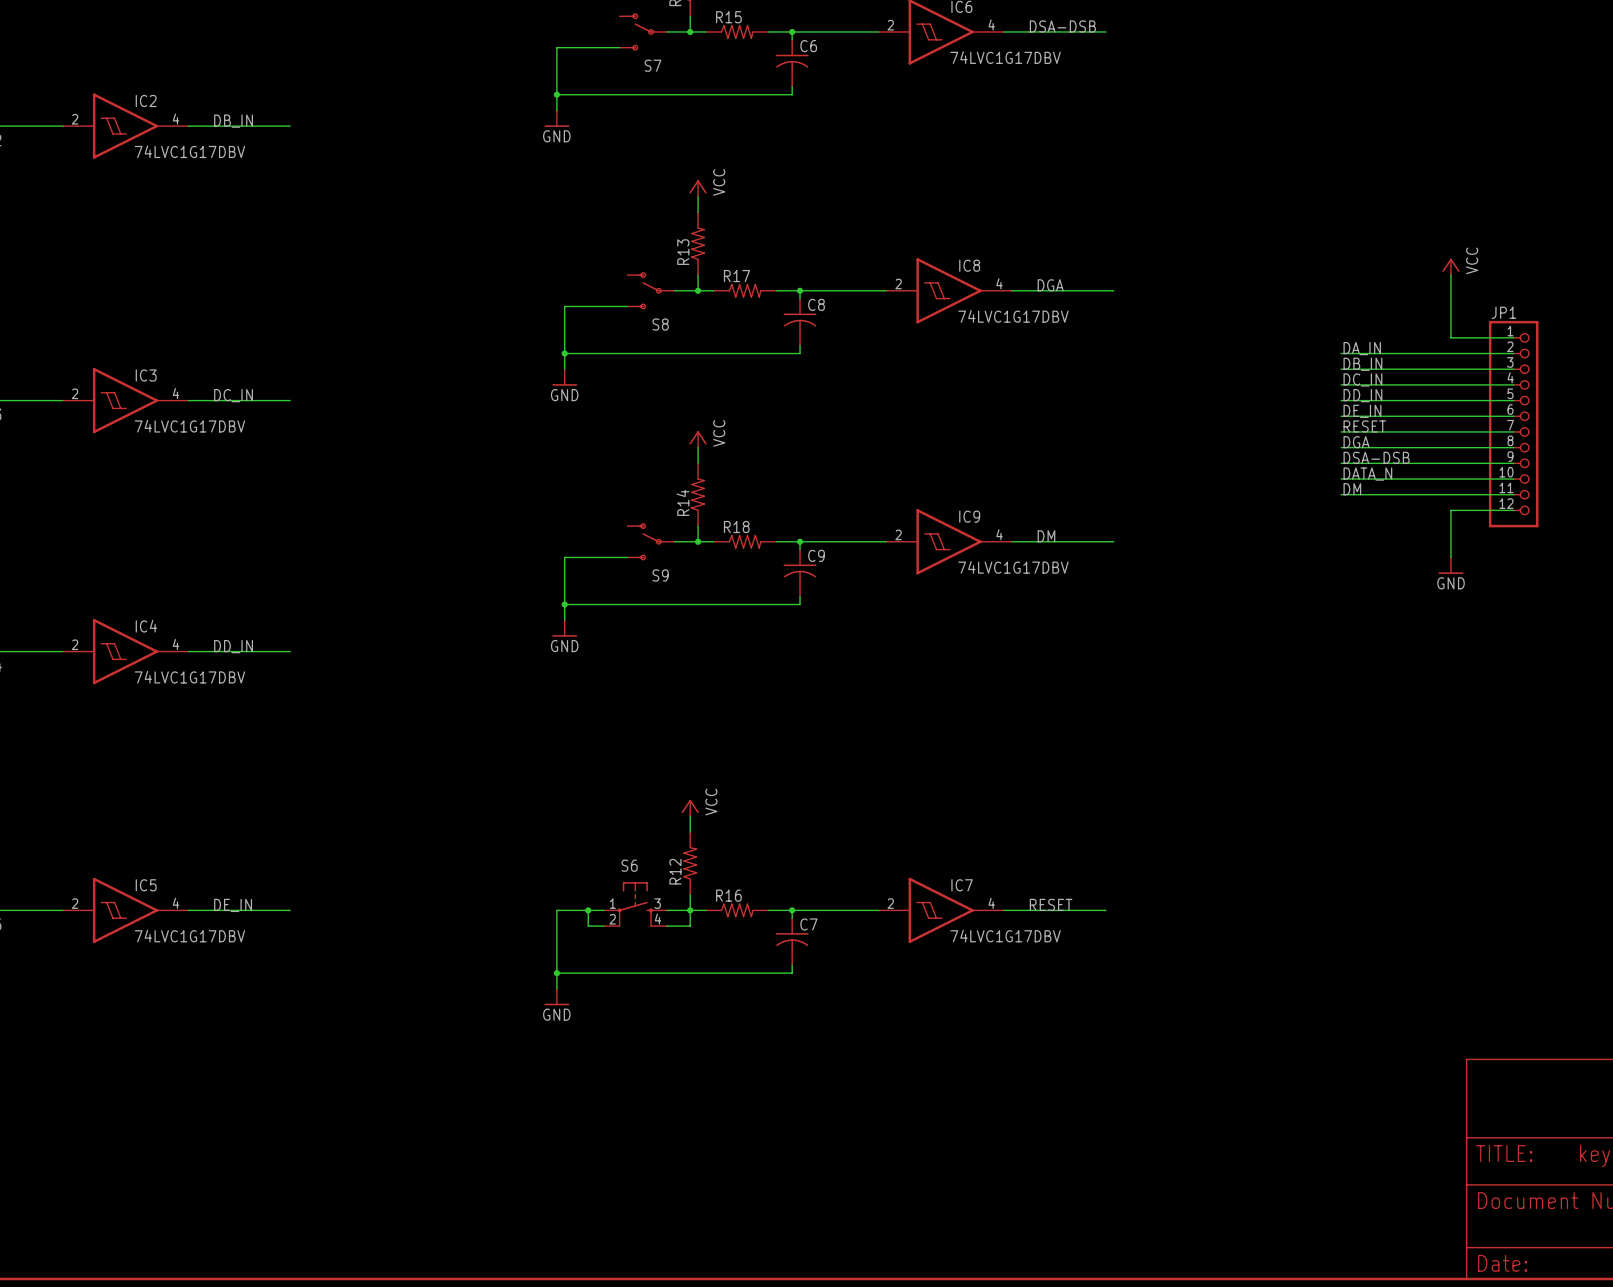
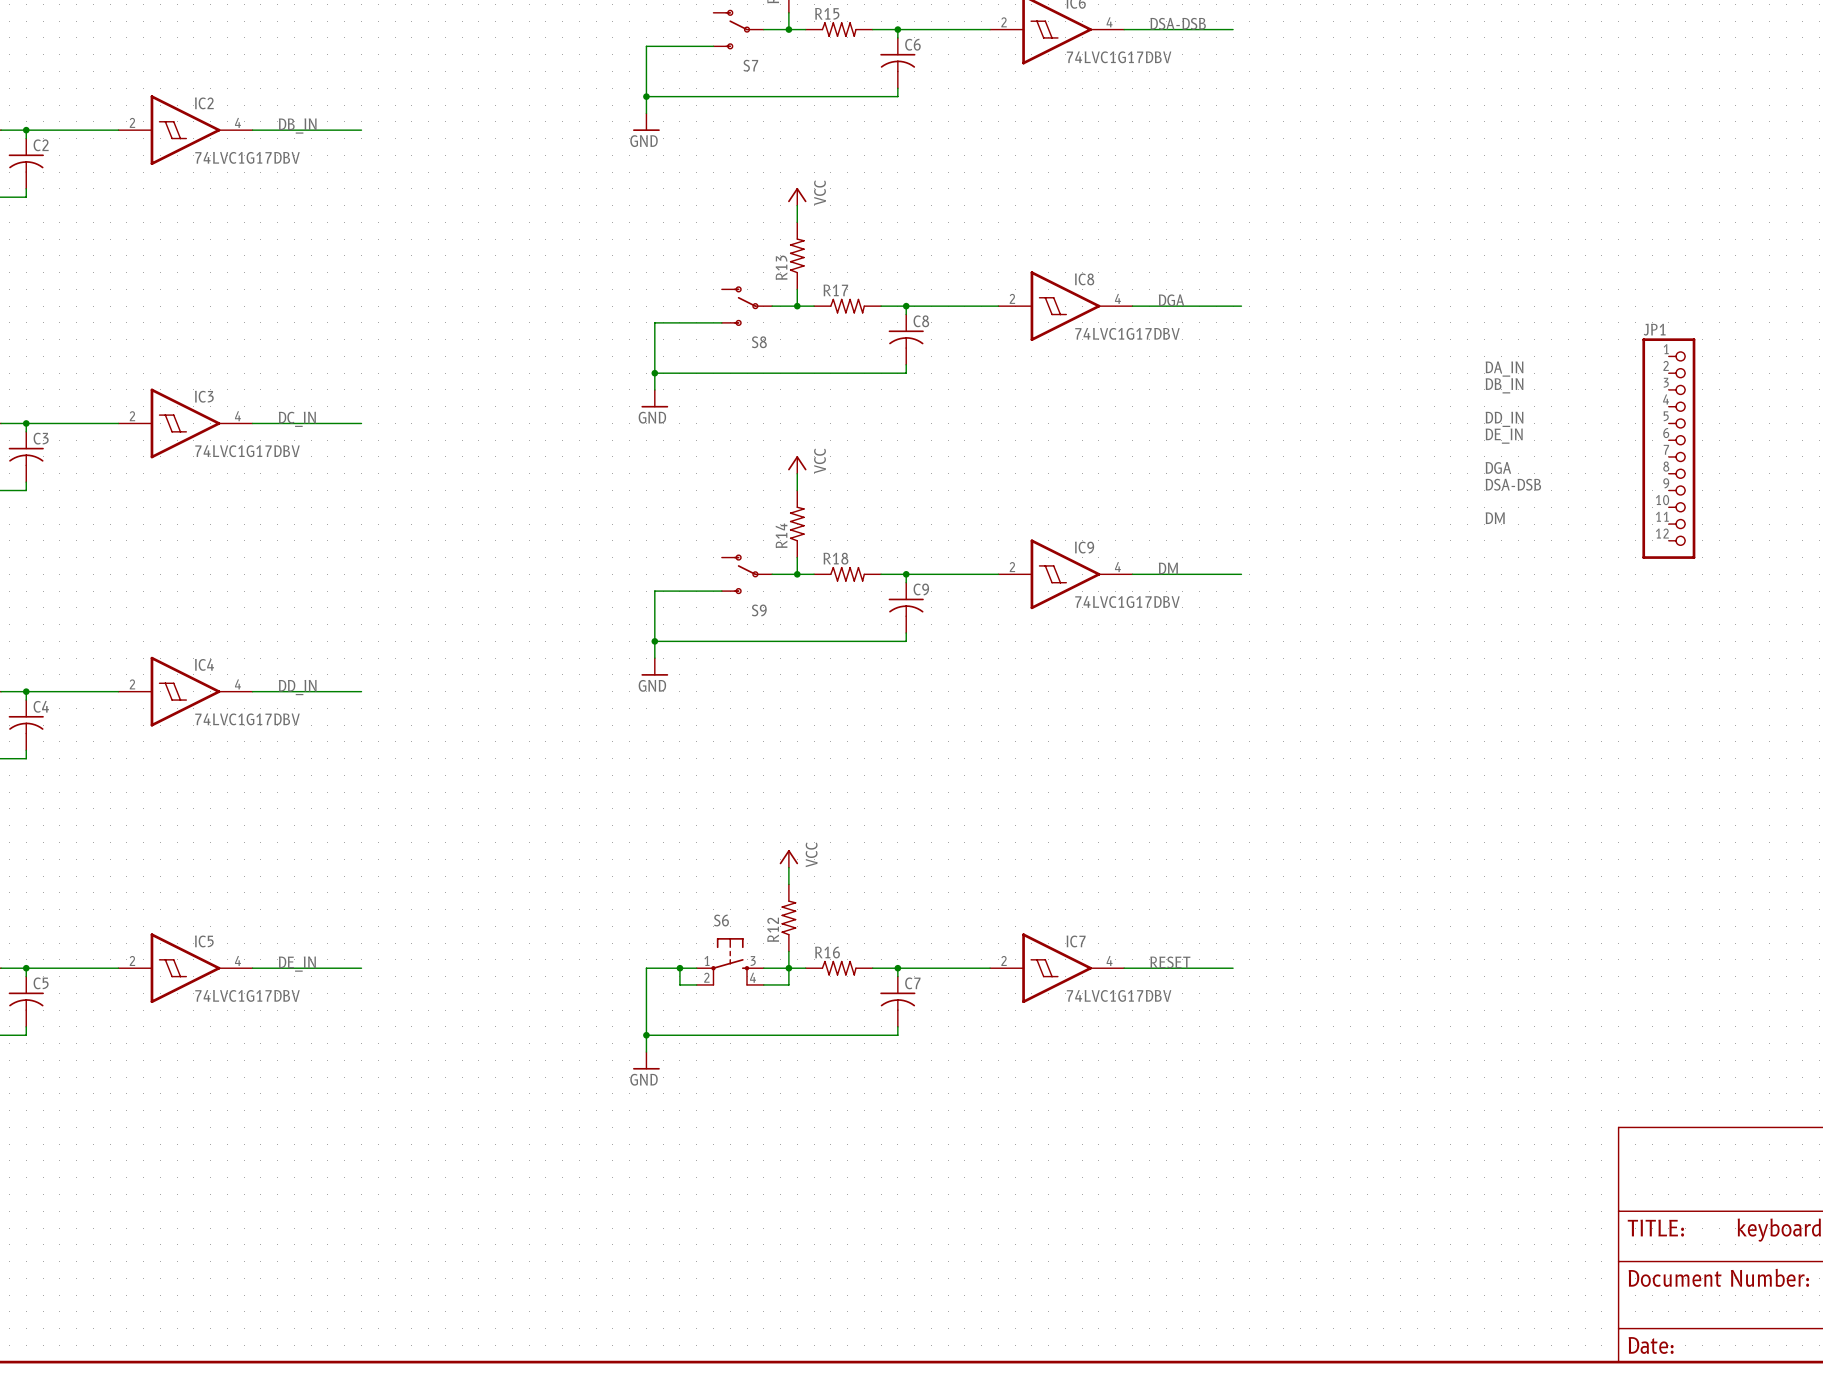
power symbol: VCC (1450, 266) -> none
wire: (1450, 275) (1450, 337) (1513, 337) -> none
wire: (1341, 353) (1513, 353) -> none
wire: (1341, 369) (1513, 369) -> none
label: DC_IN (1362, 379) -> none
wire: (1341, 384) (1513, 384) -> none
wire: (1341, 400) (1513, 400) -> none
wire: (1341, 416) (1513, 416) -> none
label: RESET (1364, 426) -> none
wire: (1341, 431) (1513, 431) -> none
wire: (1341, 447) (1513, 447) -> none
wire: (1341, 463) (1513, 463) -> none
label: DATA_N (1367, 474) -> none
wire: (1341, 479) (1513, 479) -> none
wire: (1341, 494) (1513, 494) -> none
wire: (1513, 510) (1450, 510) (1450, 557) -> none
power symbol: GND (1450, 565) -> none

